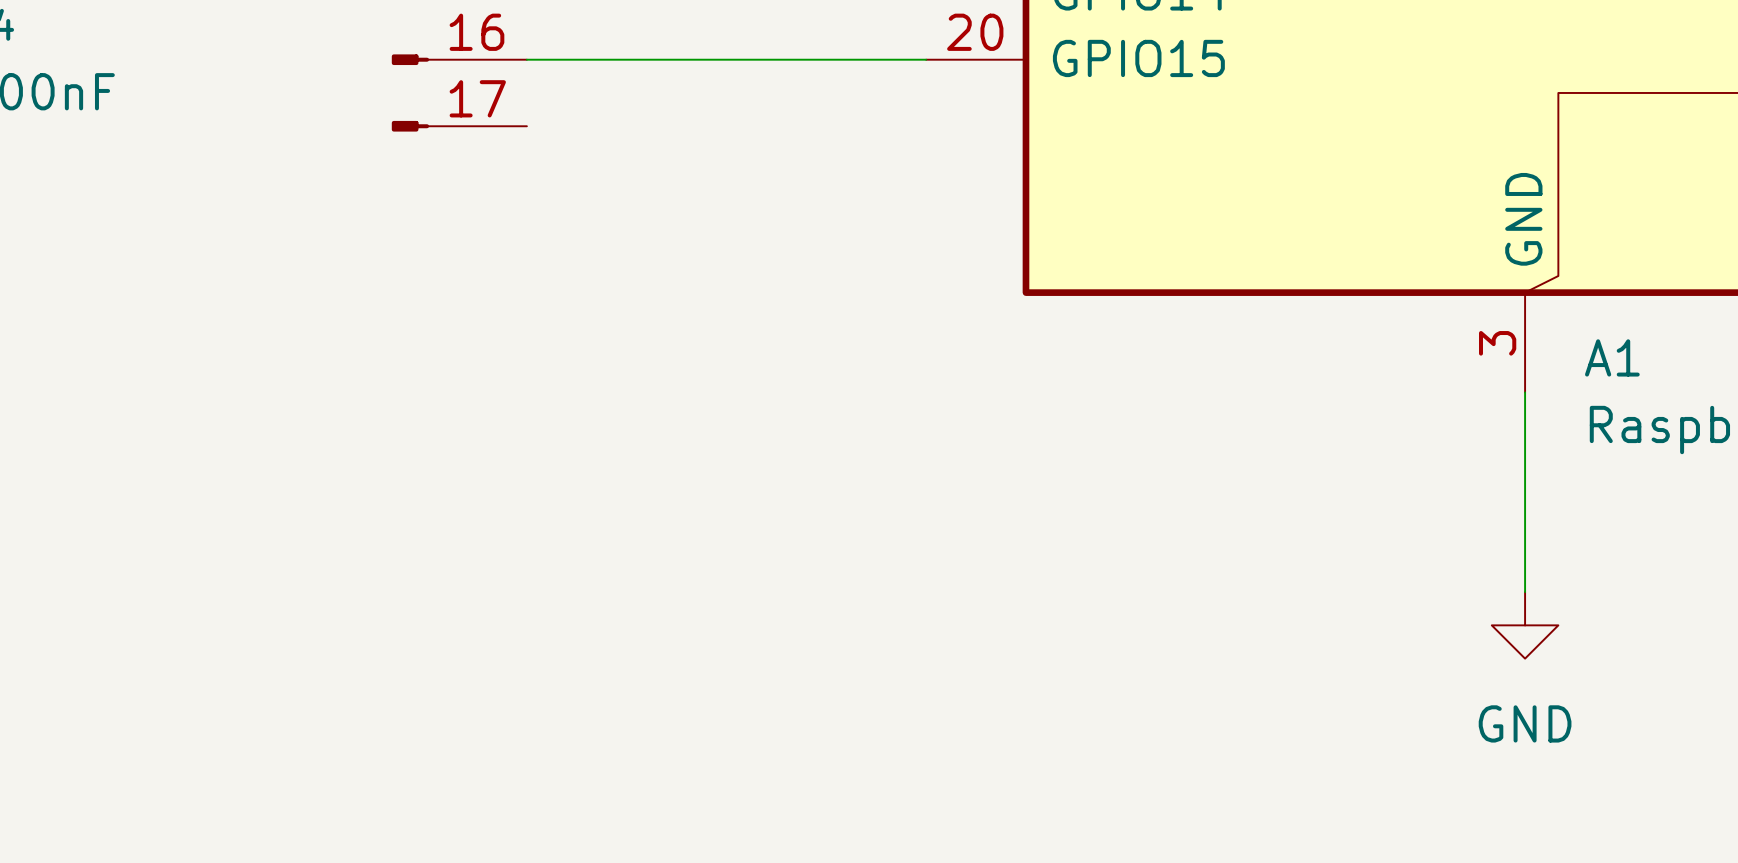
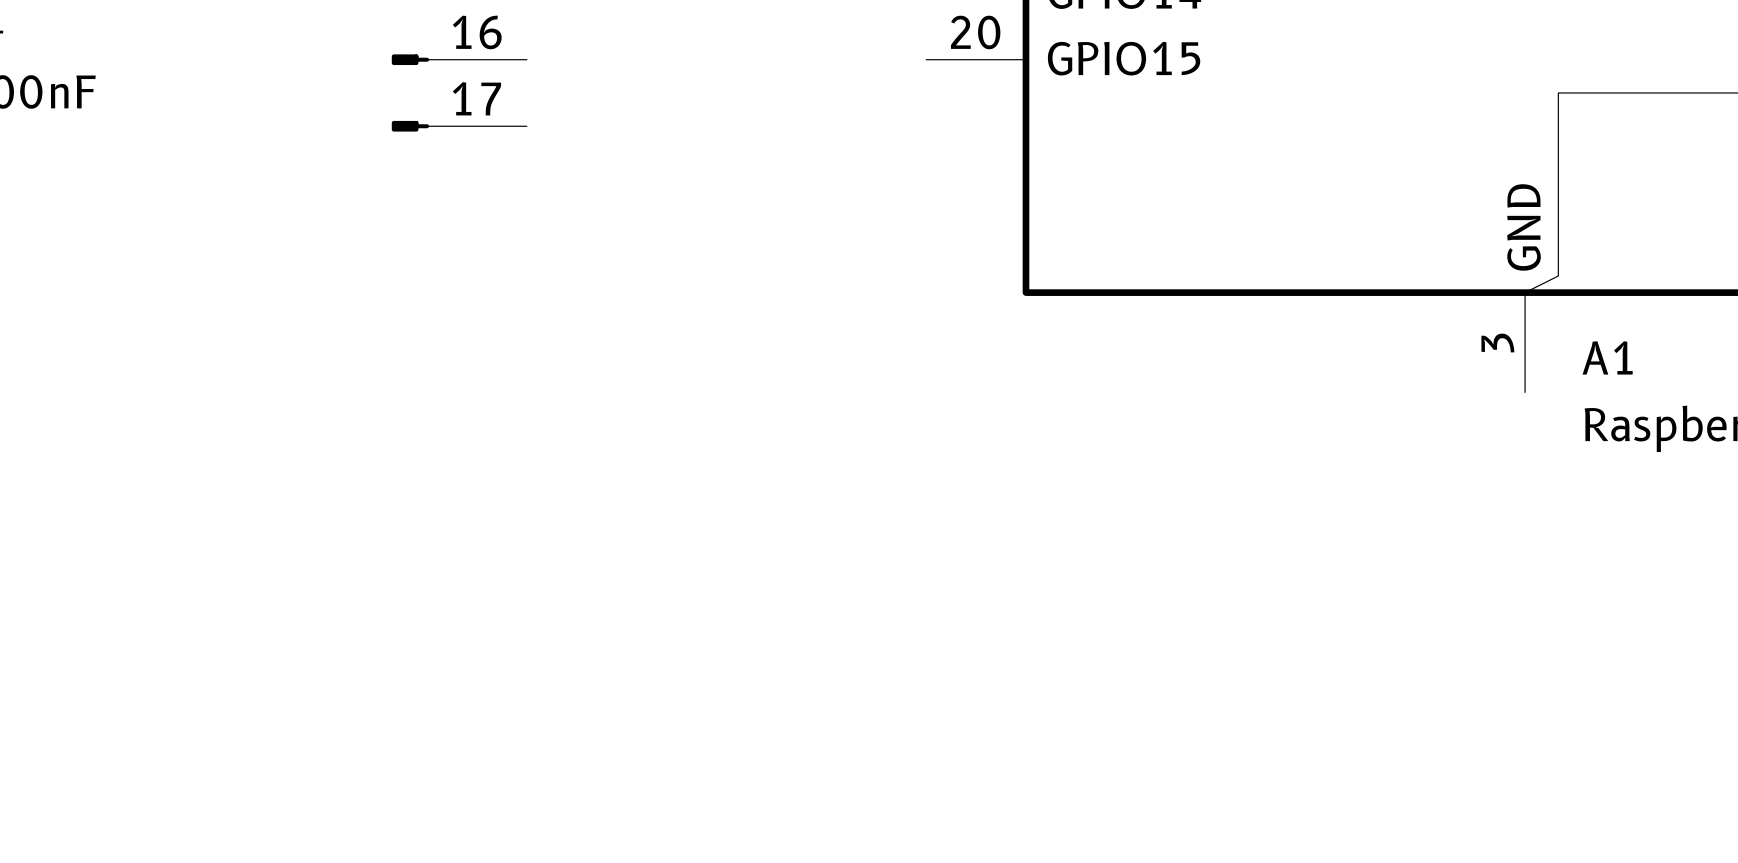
wire: (526, 59) (926, 59) -> none
wire: (1525, 392) (1525, 592) -> none
power symbol: GND (1525, 625) -> none

